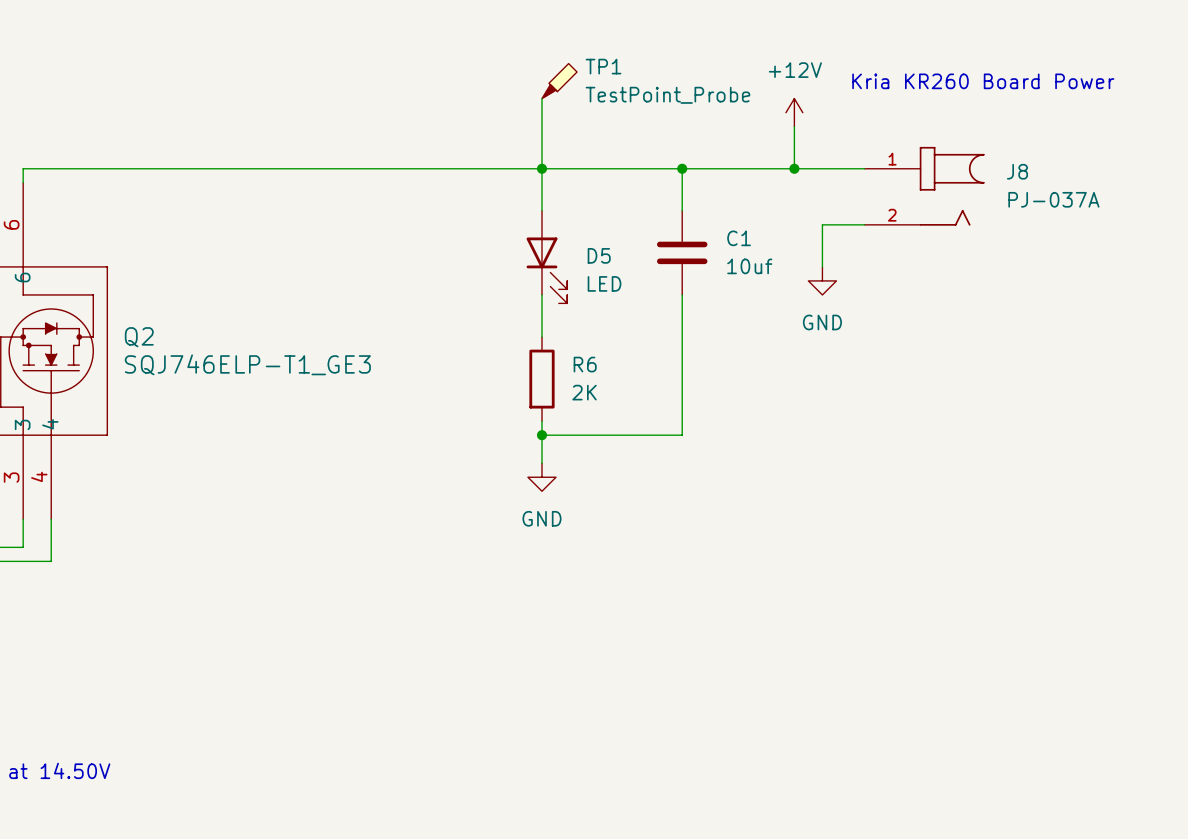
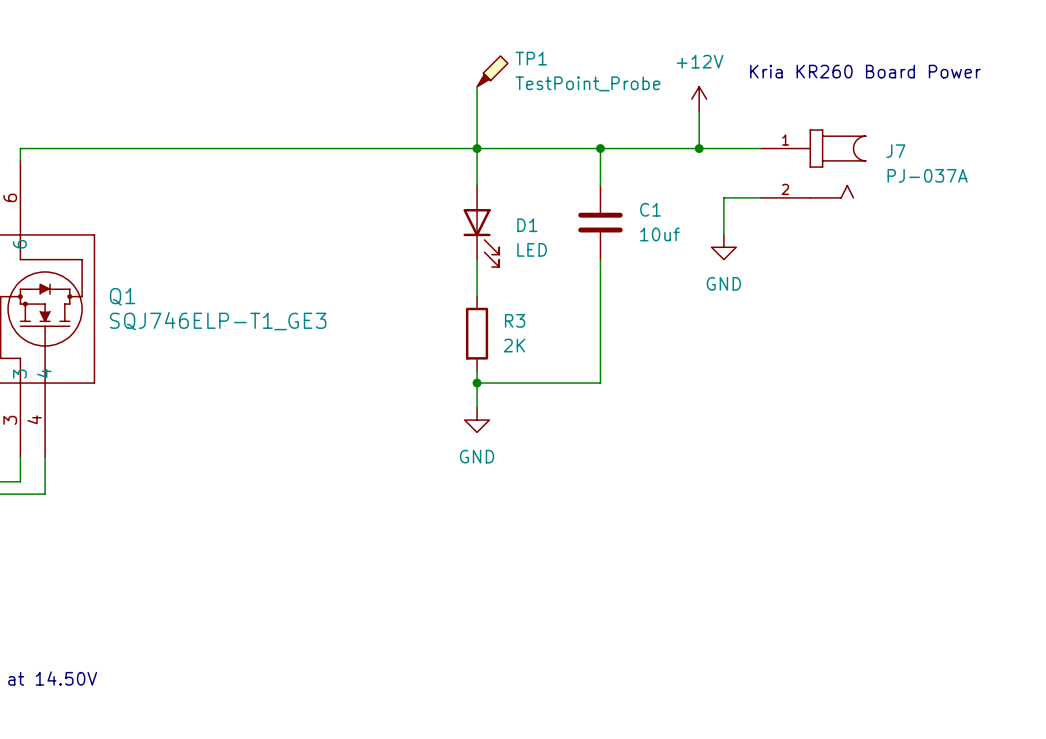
J8 name: J8 (1017, 171) -> J7 (895, 151)
D5 name: D5 (599, 255) -> D1 (527, 225)
Q2 name: Q2 (139, 337) -> Q1 (122, 296)
R6 name: R6 (585, 364) -> R3 (515, 320)

